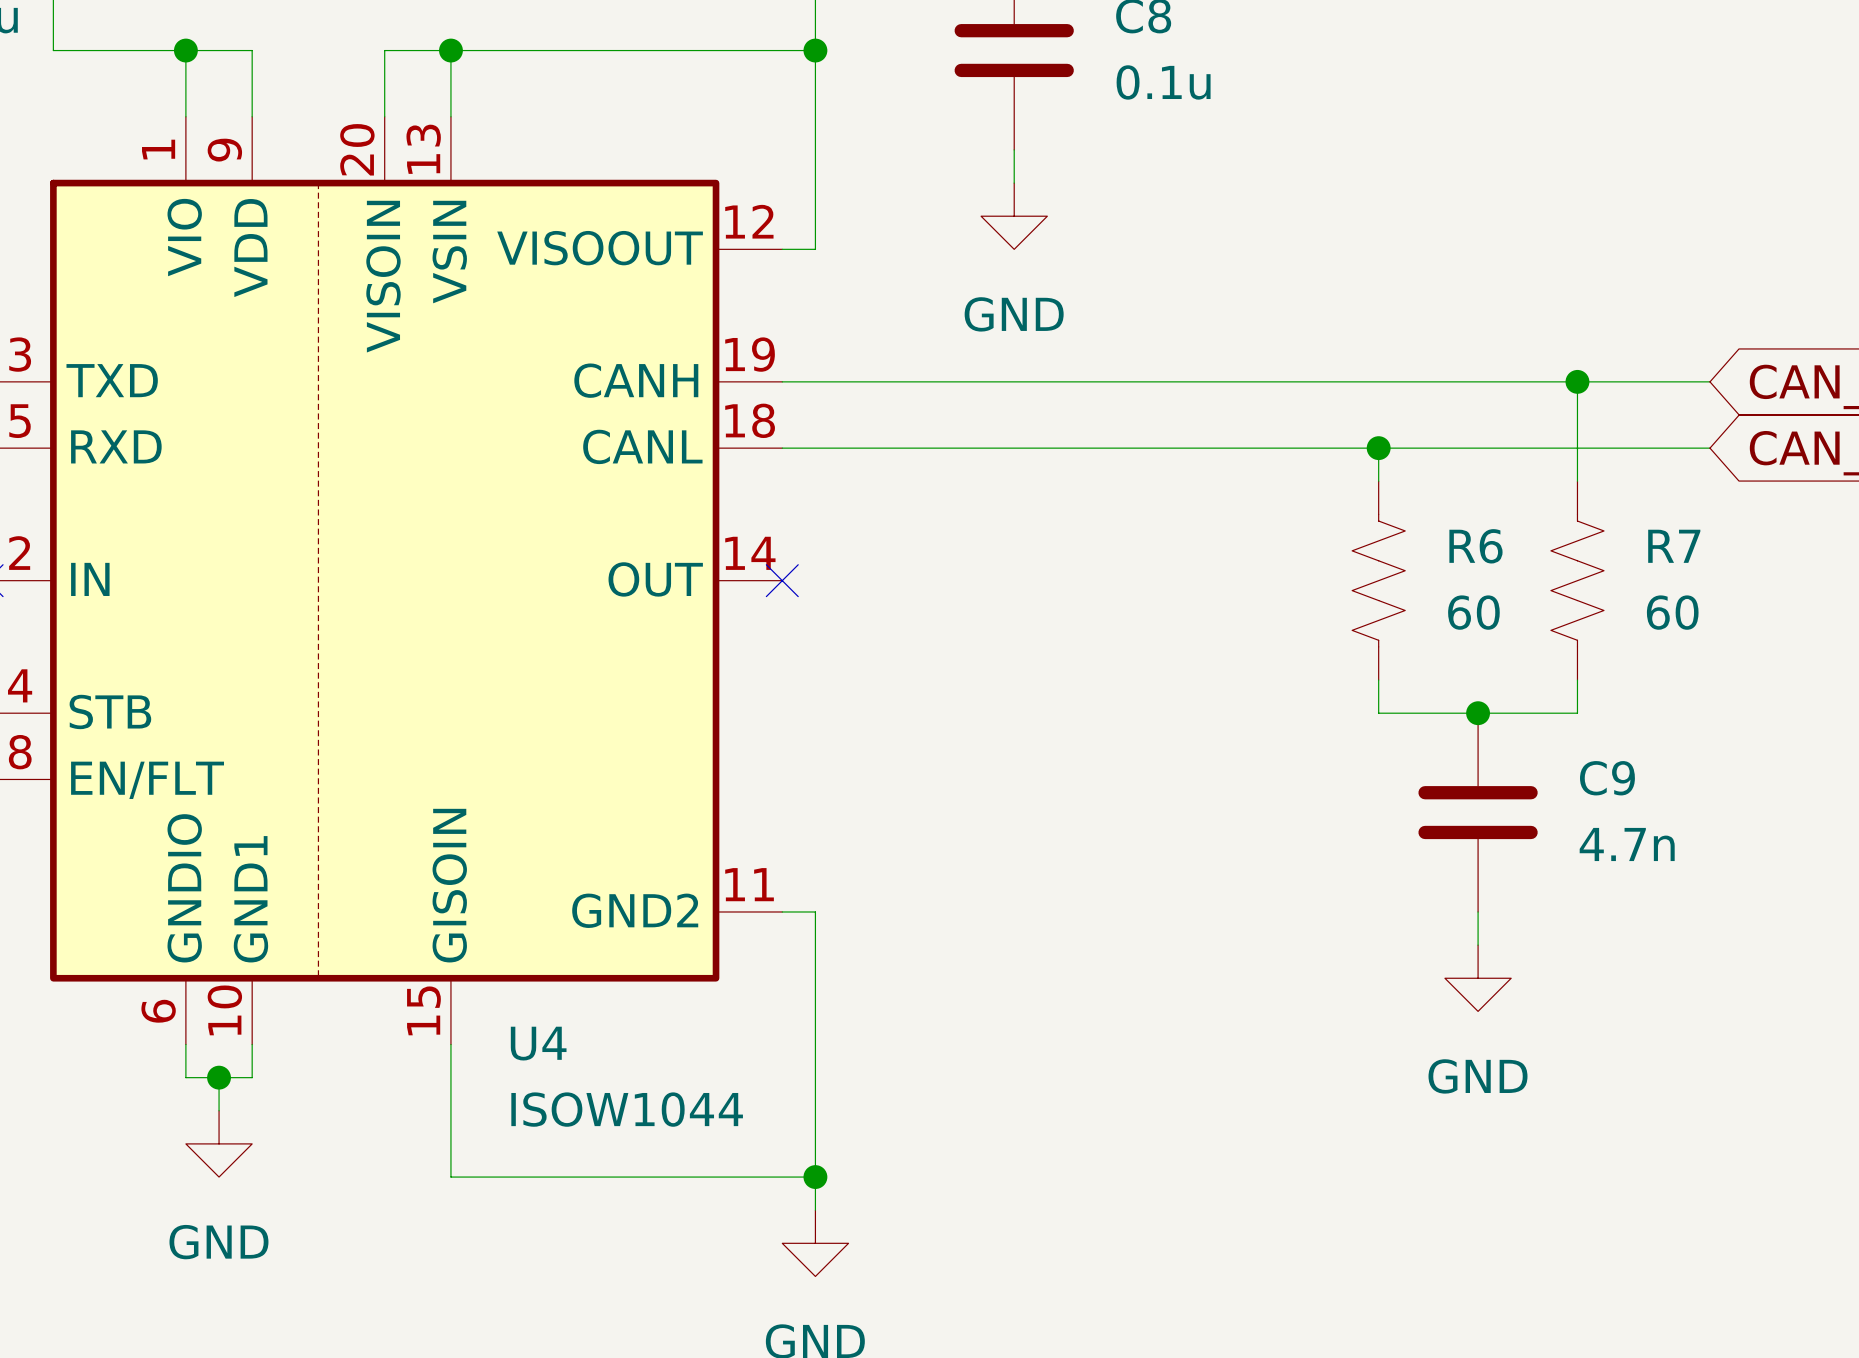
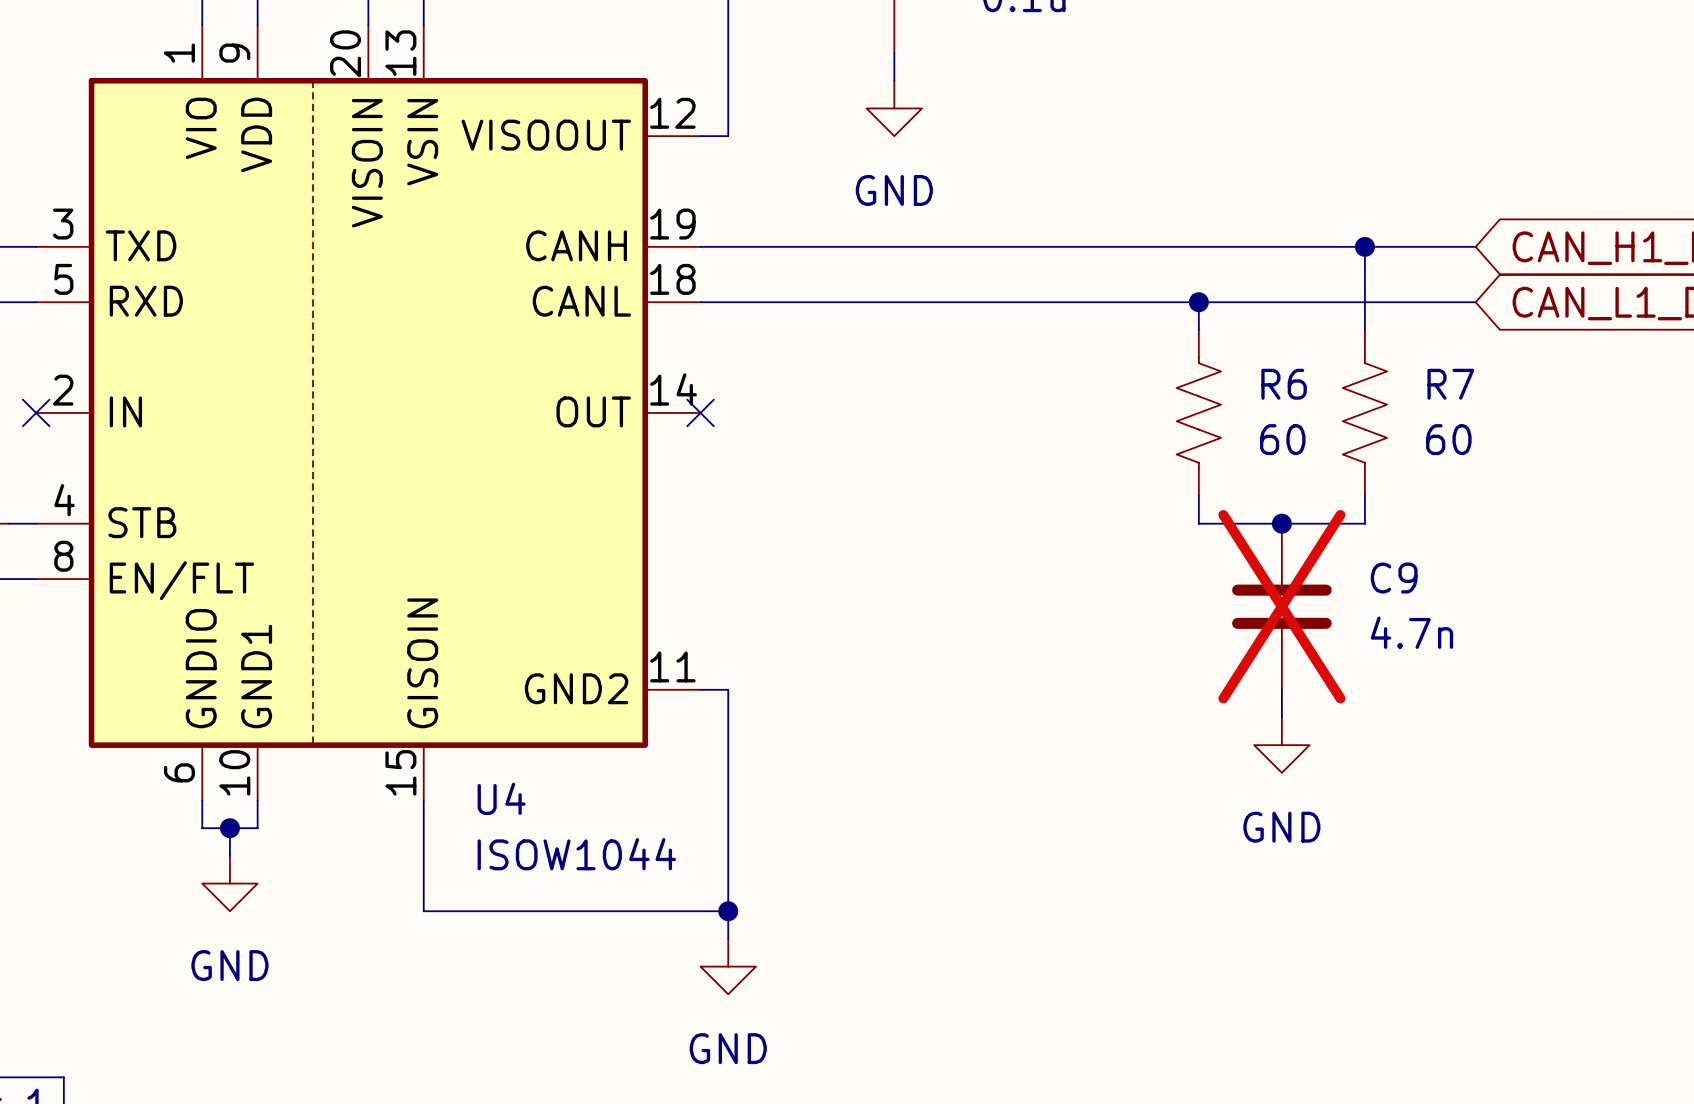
C9 do-not-place cross: none -> (1281, 606)

